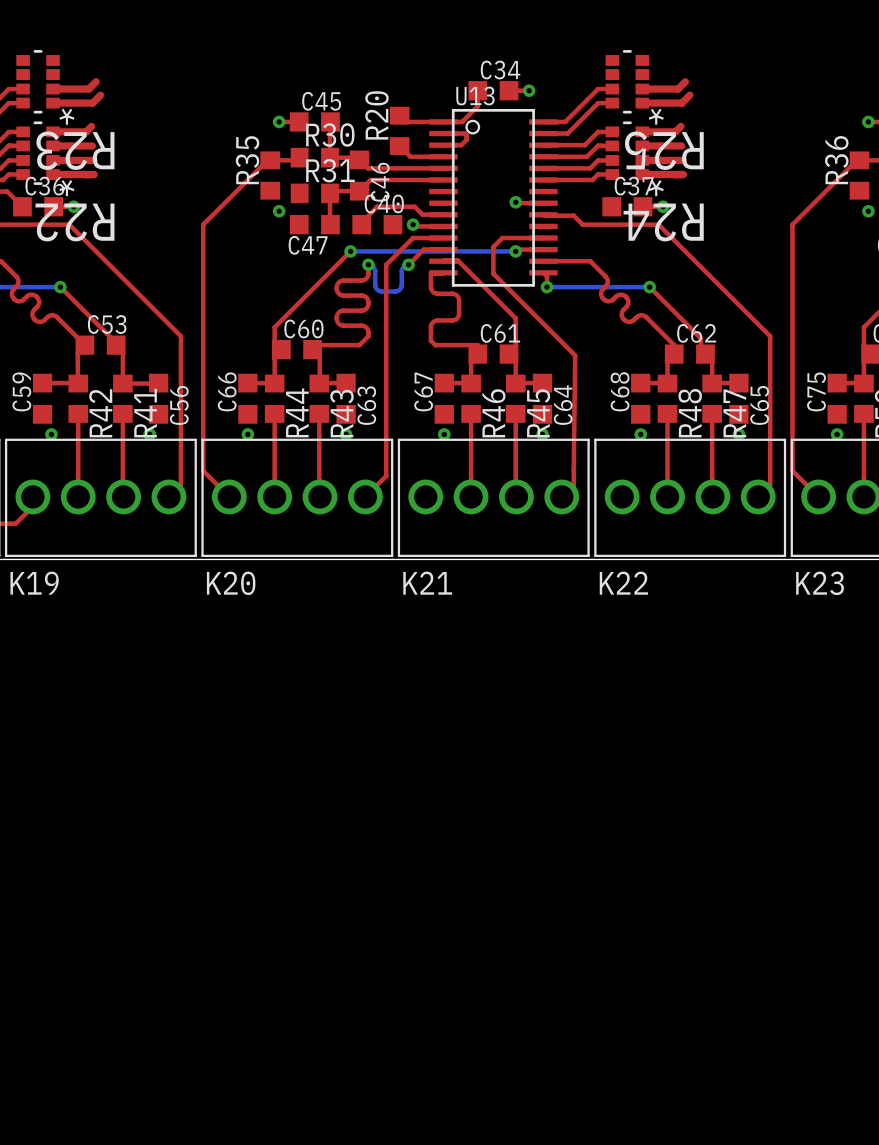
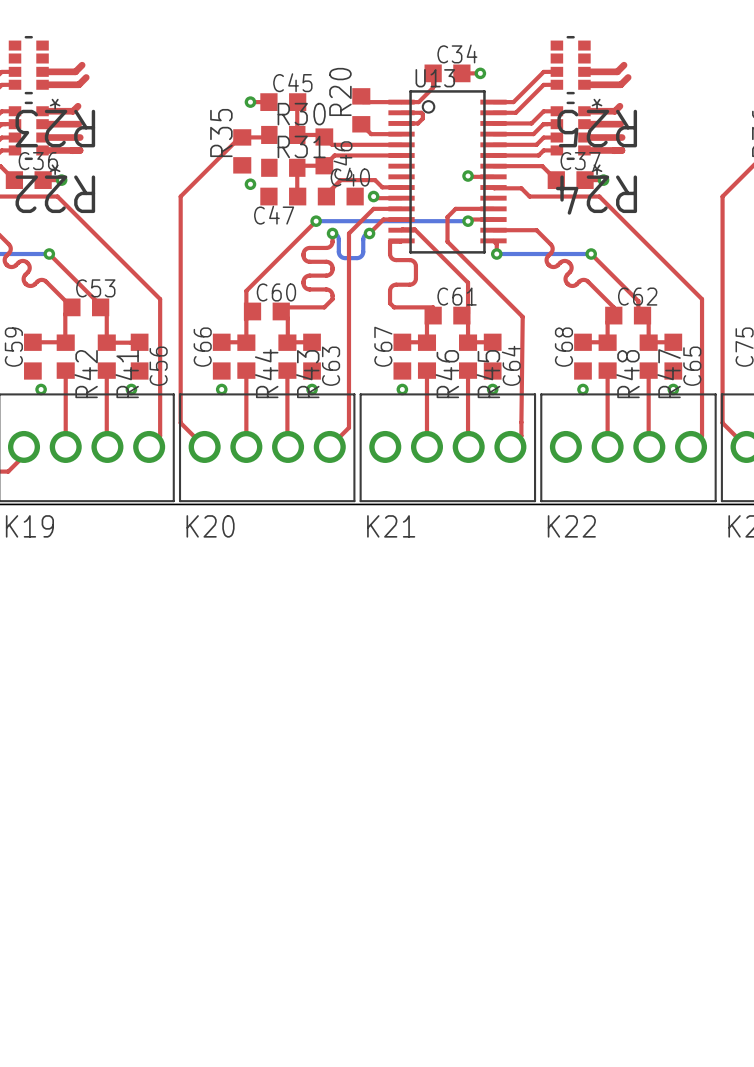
top track: none -> (493, 166) (542, 166) (556, 180)

